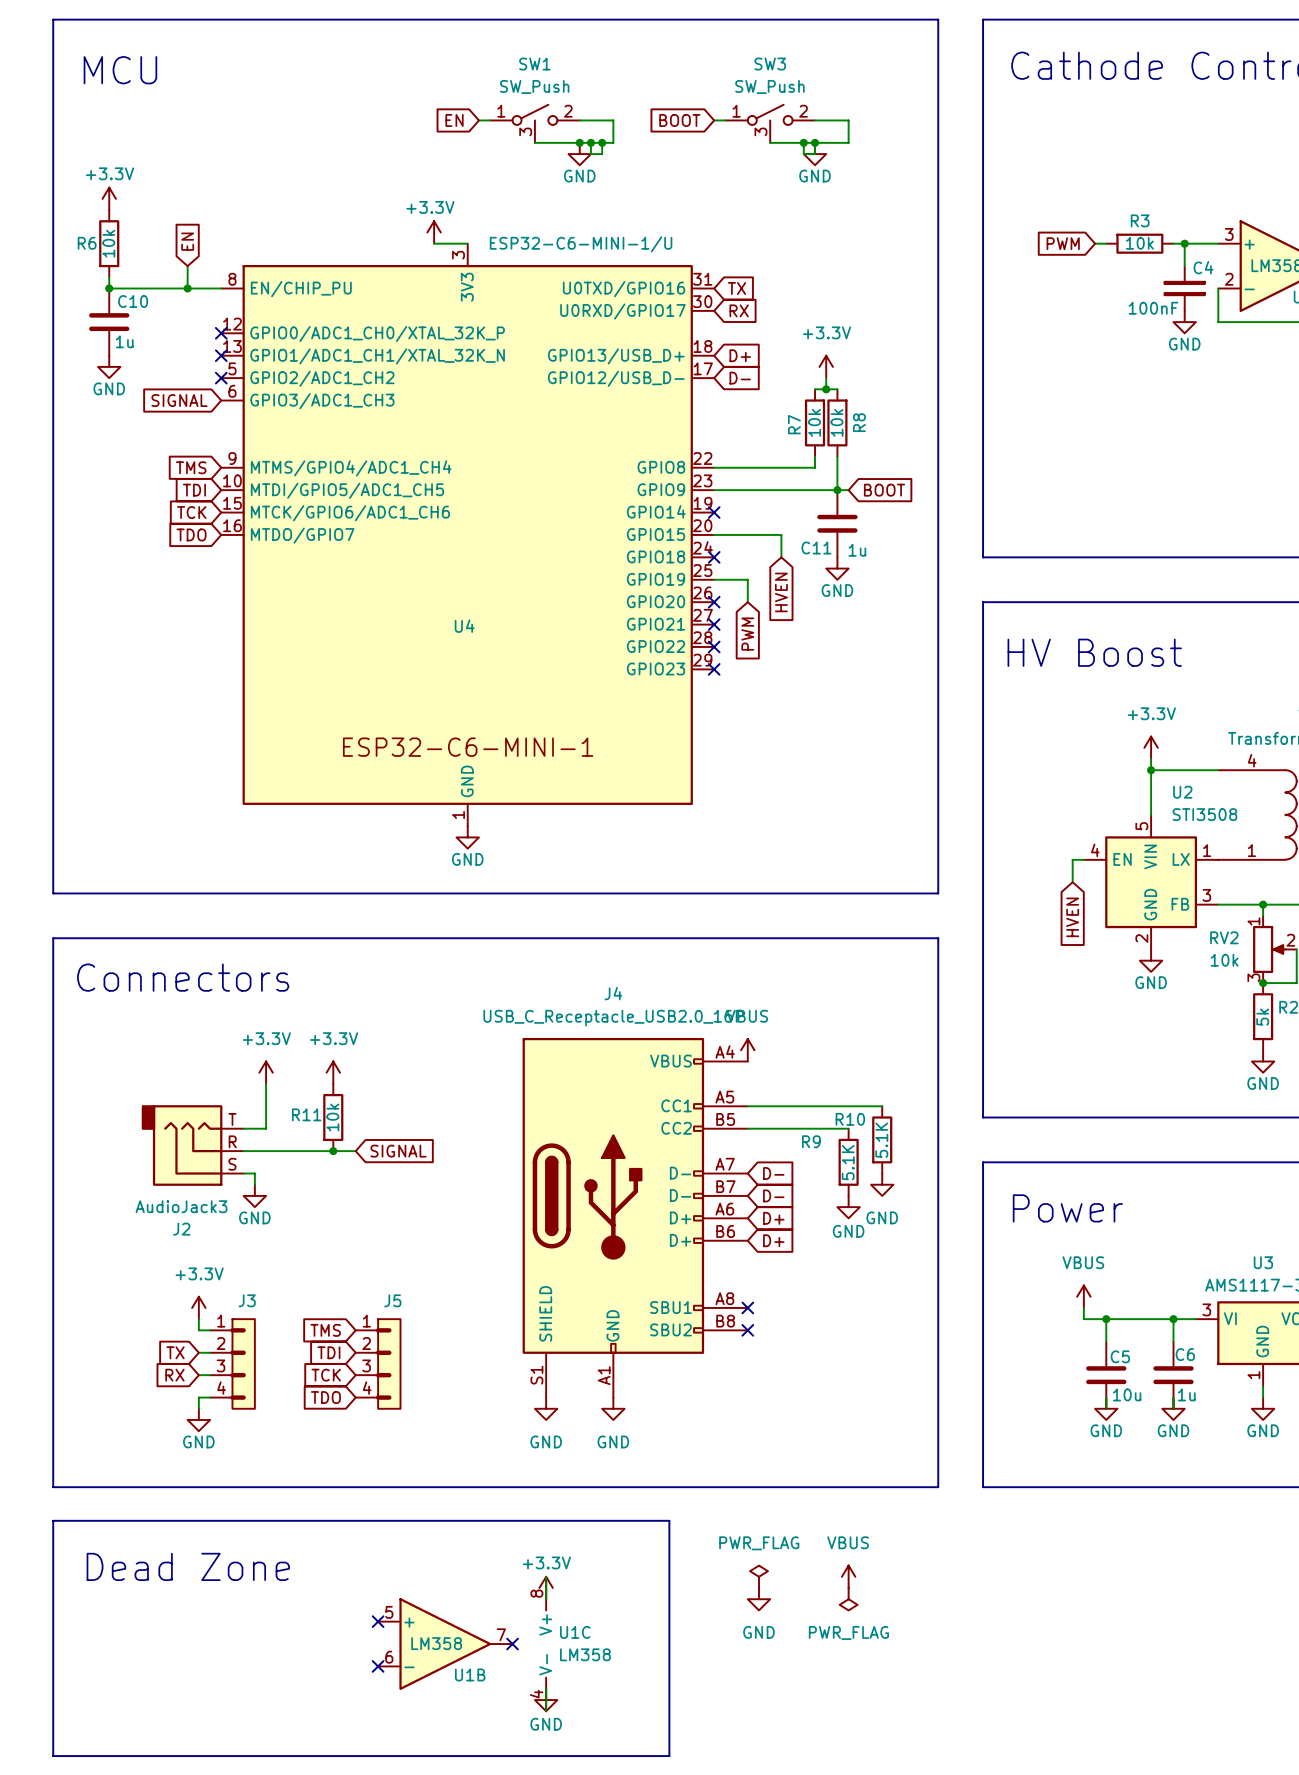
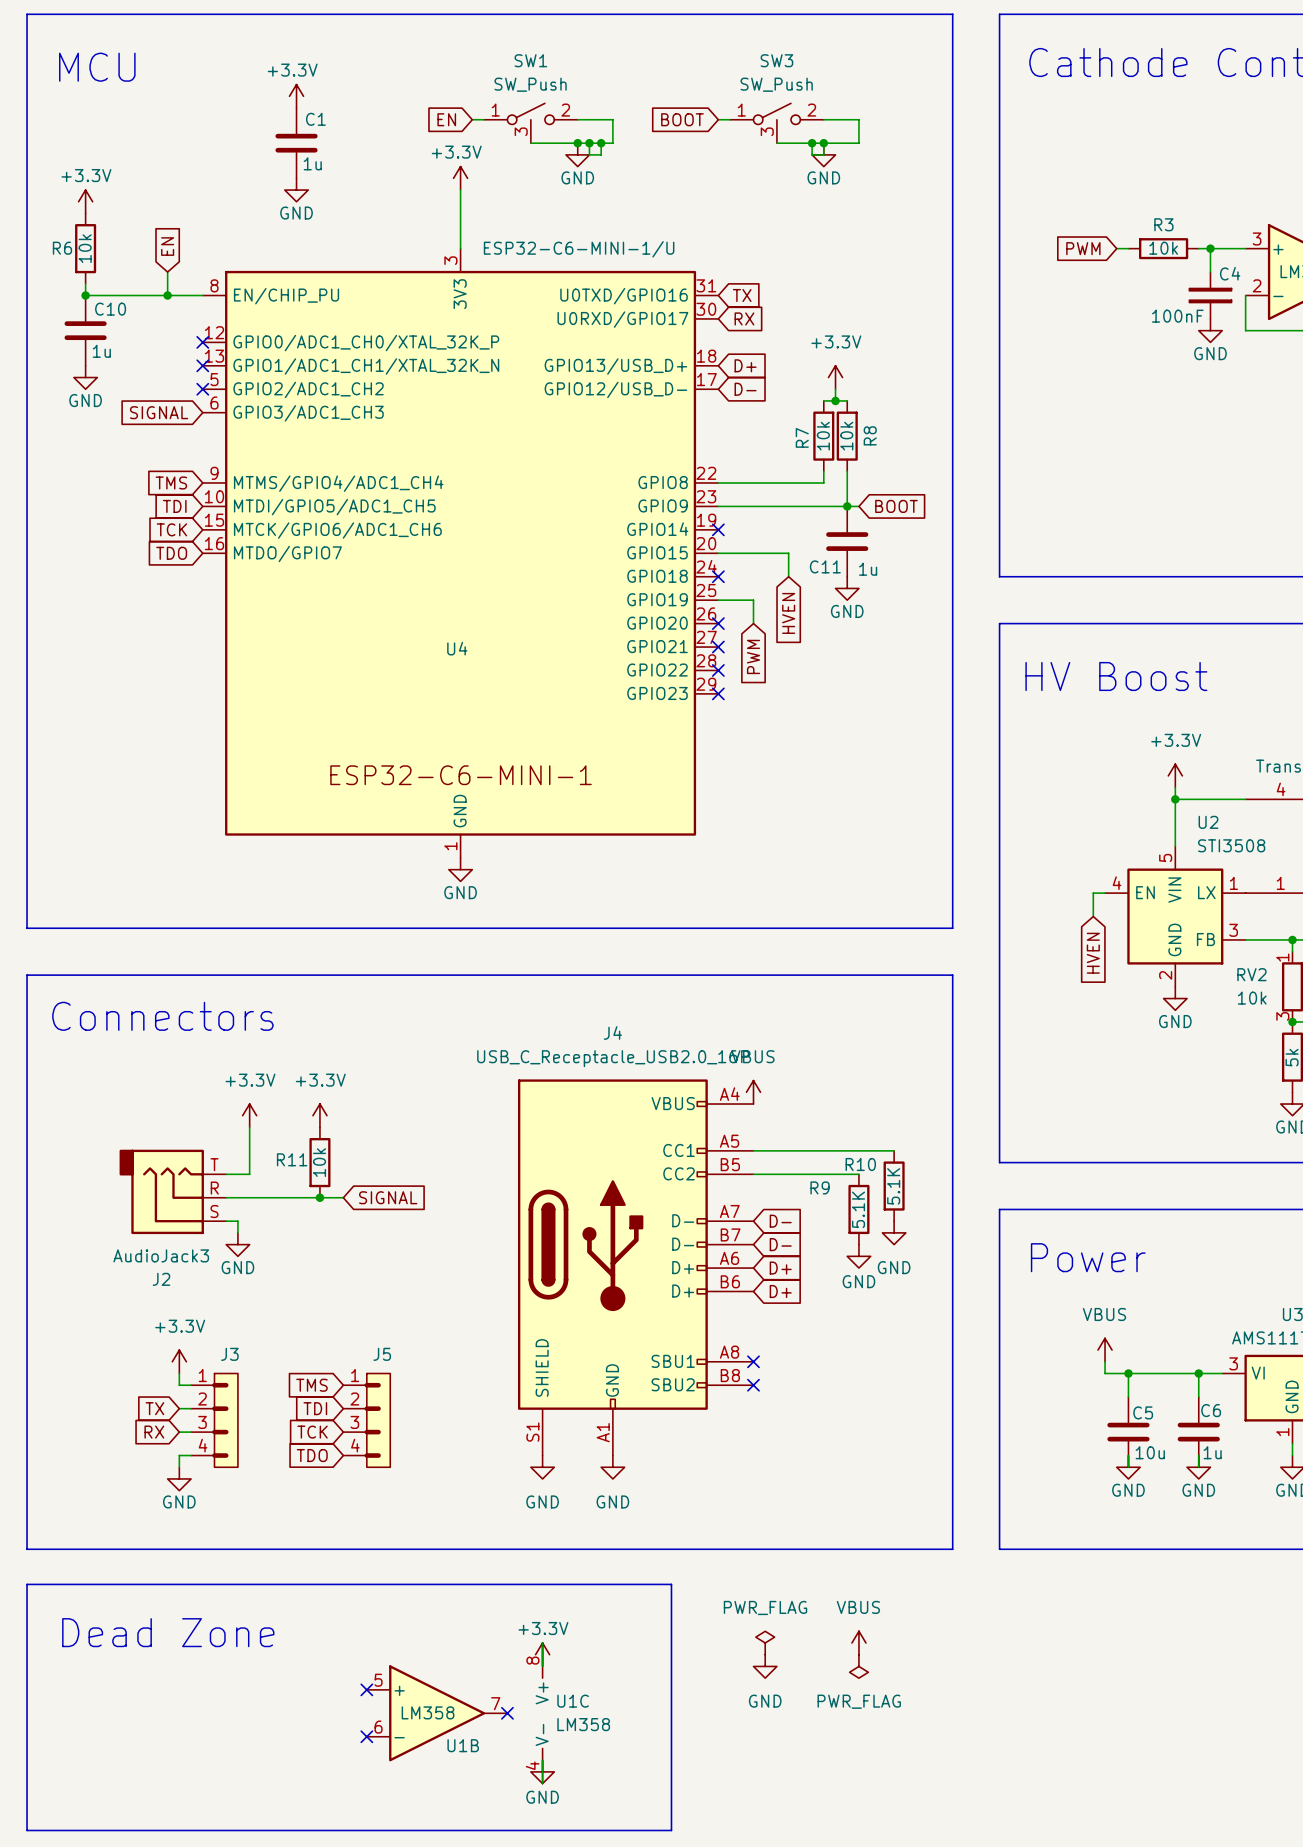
power symbol: none -> +3.3V (296, 96)
C1: none -> 1u (296, 143)
power symbol: none -> GND (296, 190)
power symbol position: +3.3V (434, 232) -> +3.3V (460, 178)
wire: (434, 243) (467, 243) -> (460, 190) (460, 248)

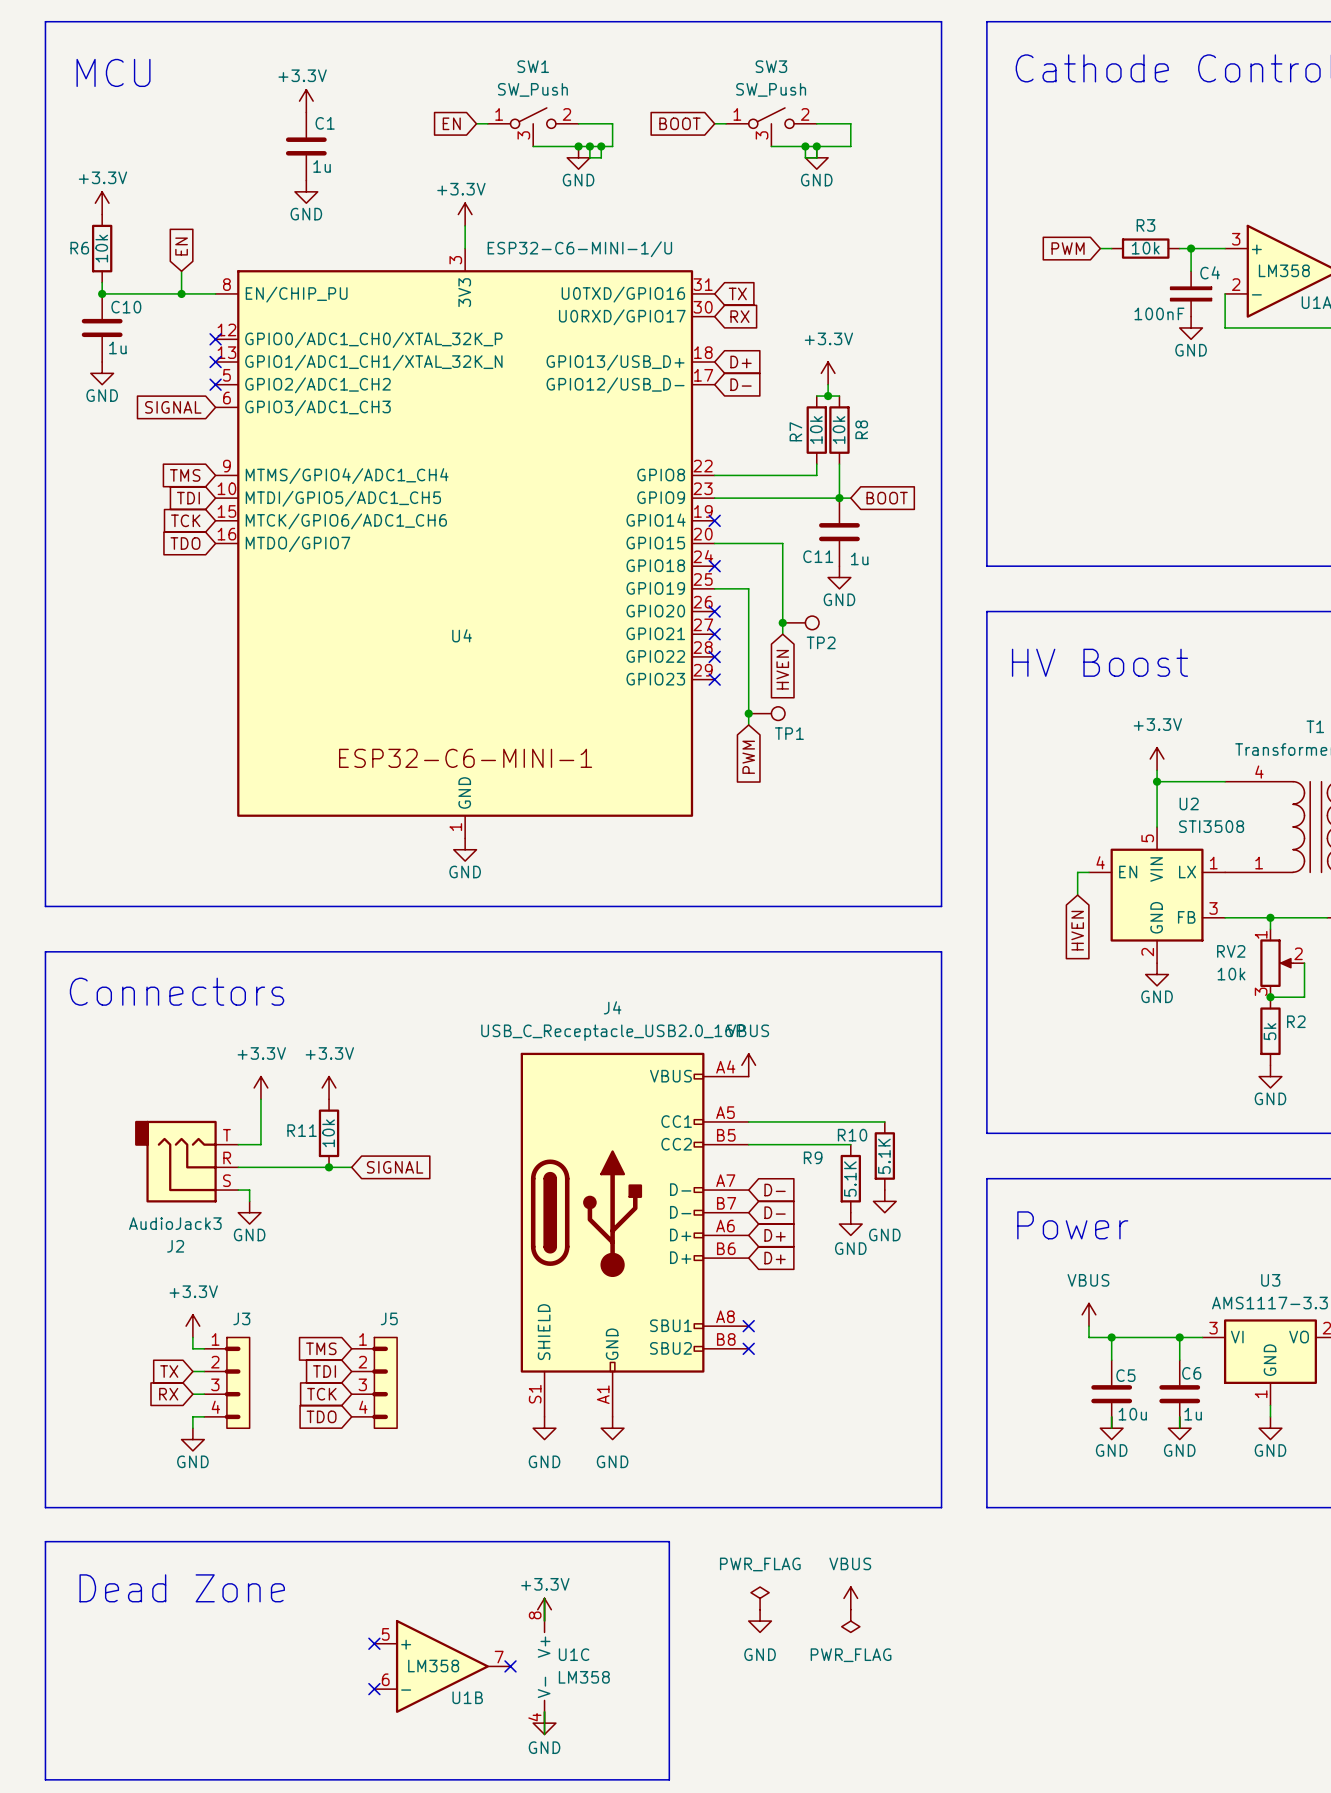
power symbol position: +3.3V (460, 178) -> +3.3V (465, 214)
wire: none -> (782, 566) (782, 634)
global label position: HVEN (788, 613) -> HVEN (782, 669)
wire: none -> (748, 611) (748, 724)
junction: none -> (782, 622)
TP2: none -> (800, 622)
global label position: PWM (753, 656) -> PWM (748, 757)
junction: none -> (748, 713)
TP1: none -> (766, 713)

